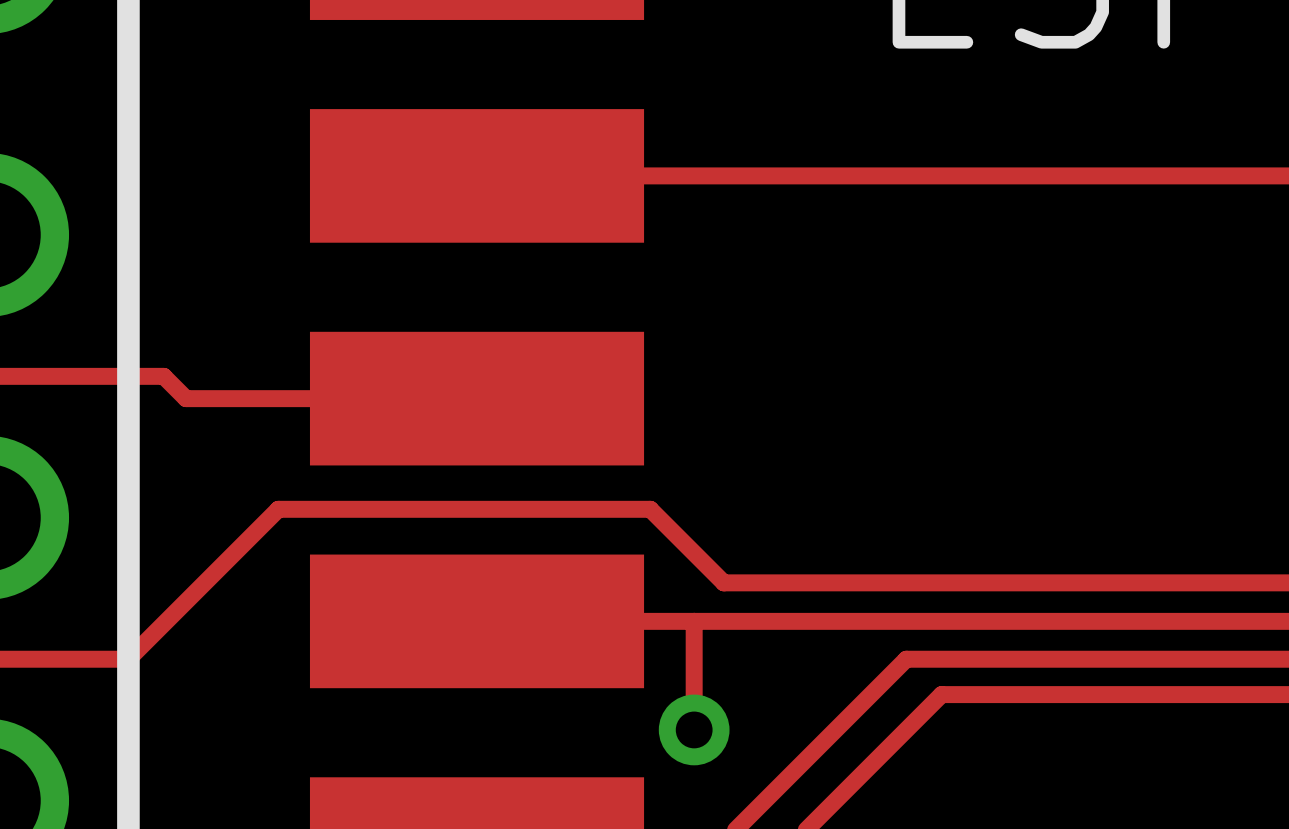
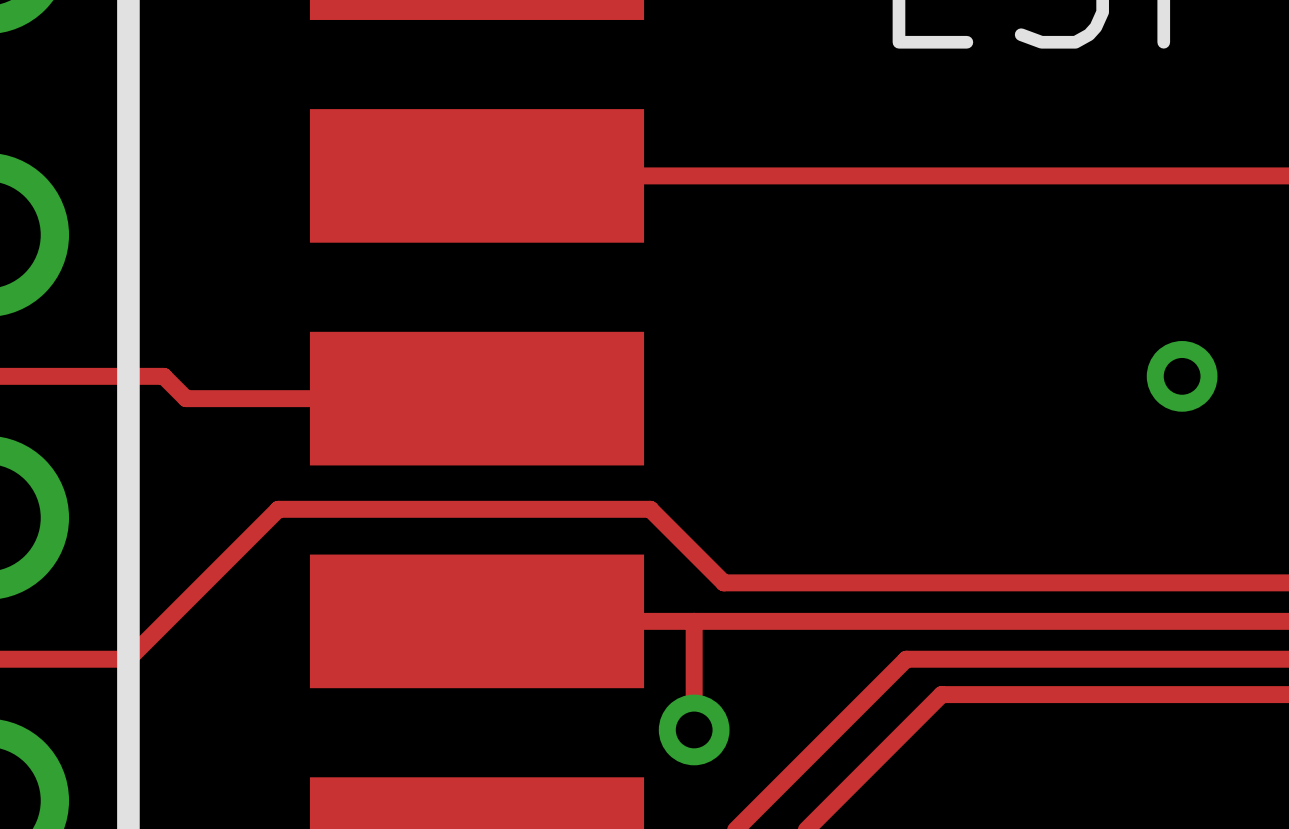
via: none -> (1182, 376)

